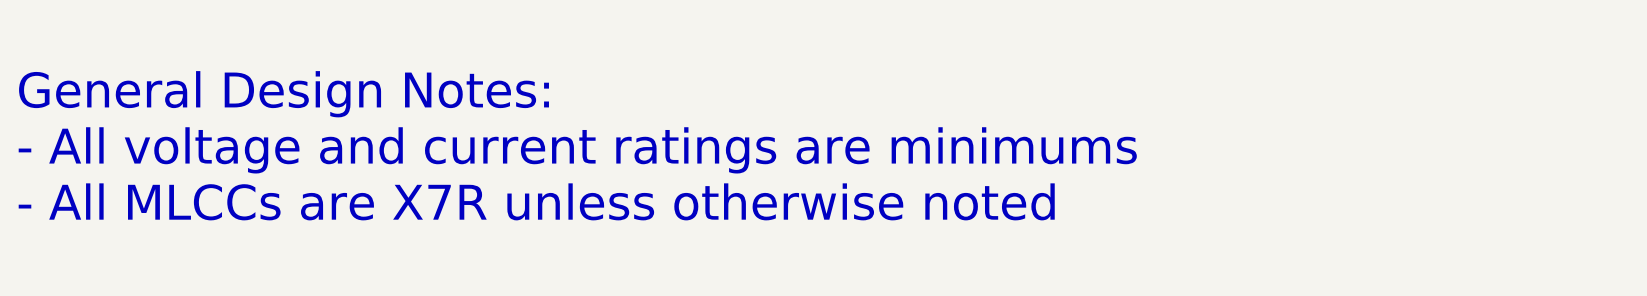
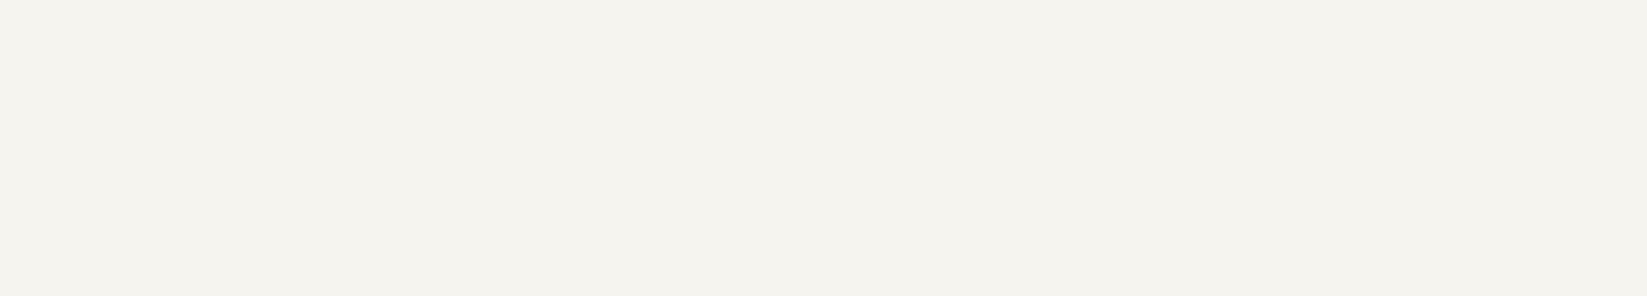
text: General Design Notes: (284, 94) -> none
text: - All voltage and current ratings are minimums (577, 150) -> none
text: - All MLCCs are X7R unless otherwise noted (536, 201) -> none

